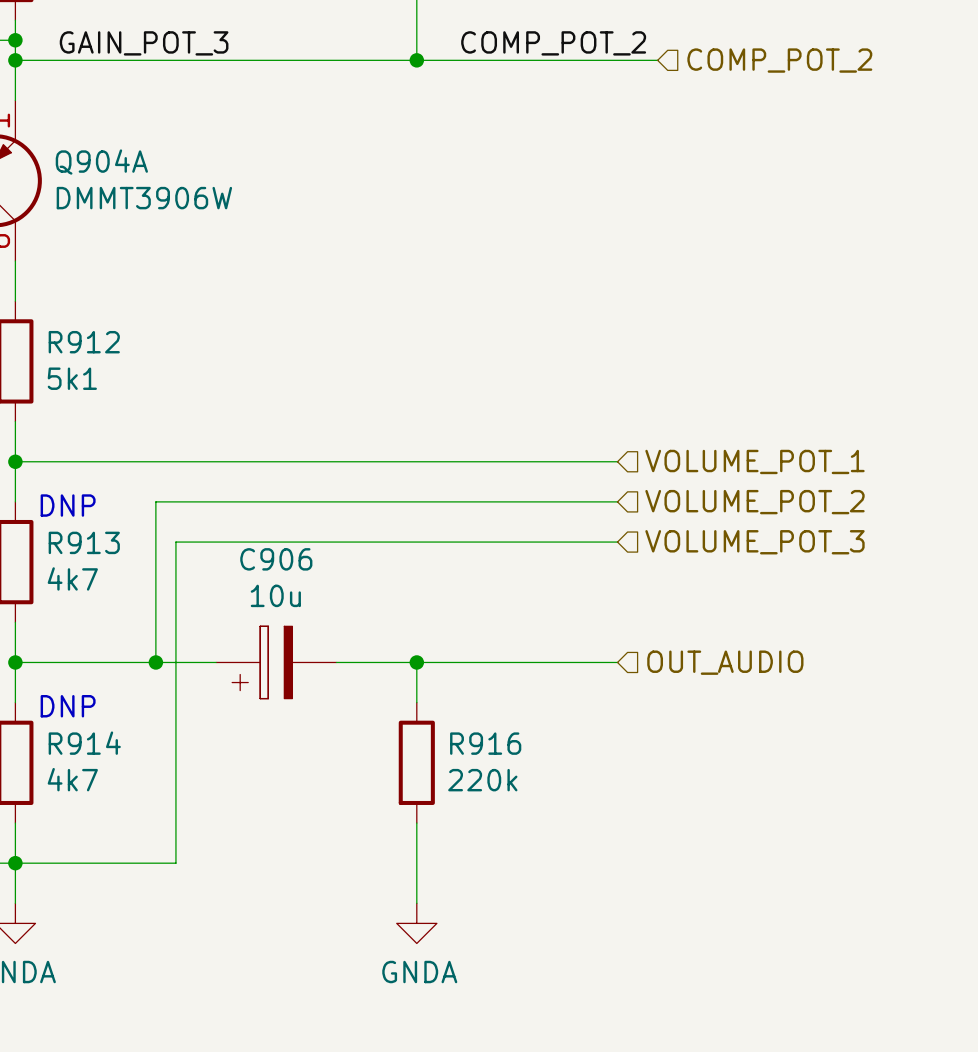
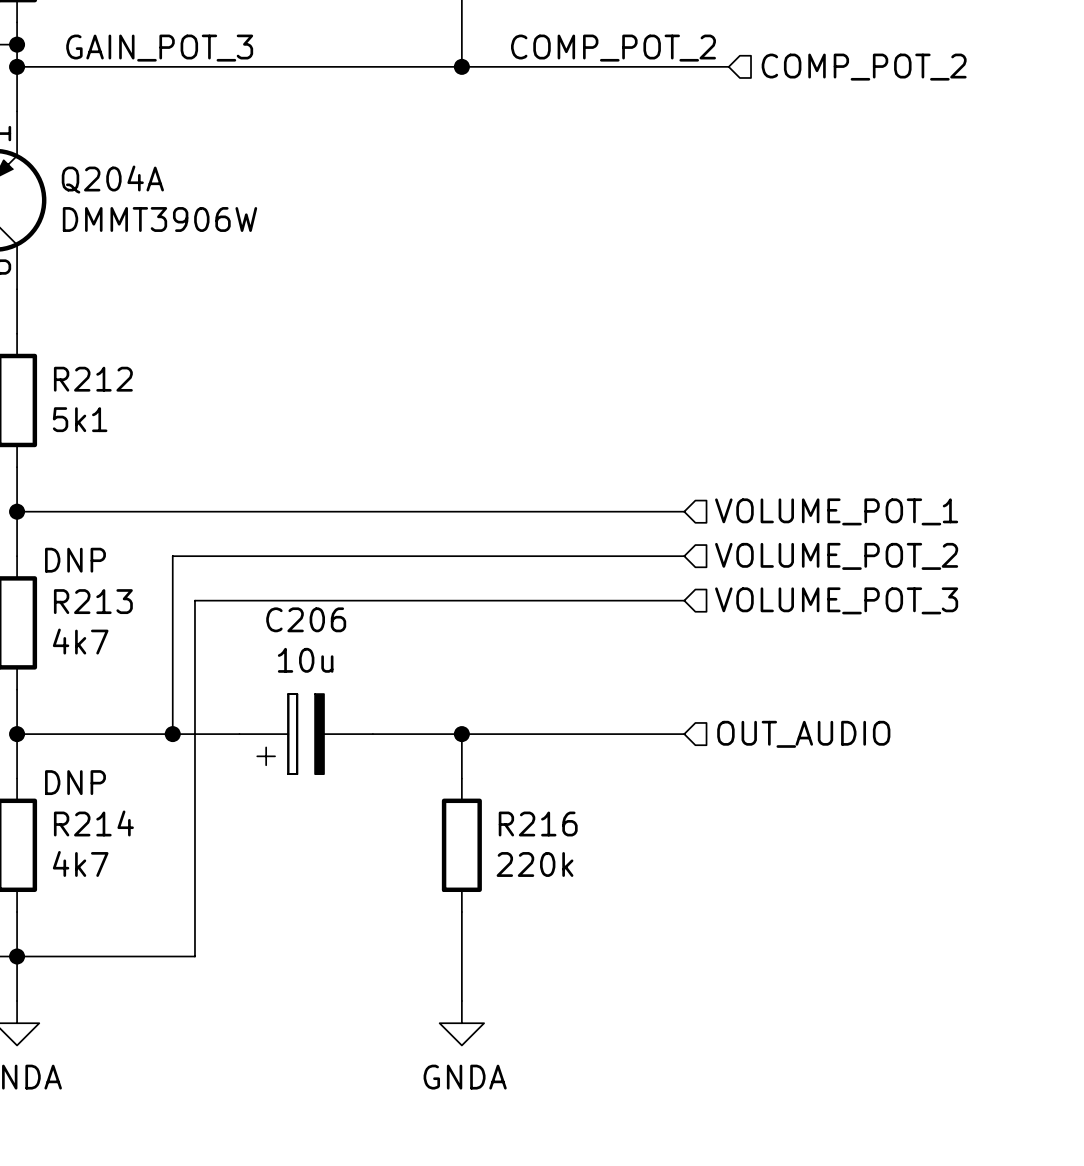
Q904A name: Q904A (101, 162) -> Q204A (112, 179)
R912 name: R912 (84, 342) -> R212 (93, 379)
R913 name: R913 (84, 542) -> R213 (93, 601)
C906 name: C906 (276, 559) -> C206 (306, 619)
R914 name: R914 (84, 743) -> R214 (93, 823)
R916 name: R916 (485, 743) -> R216 (538, 824)

